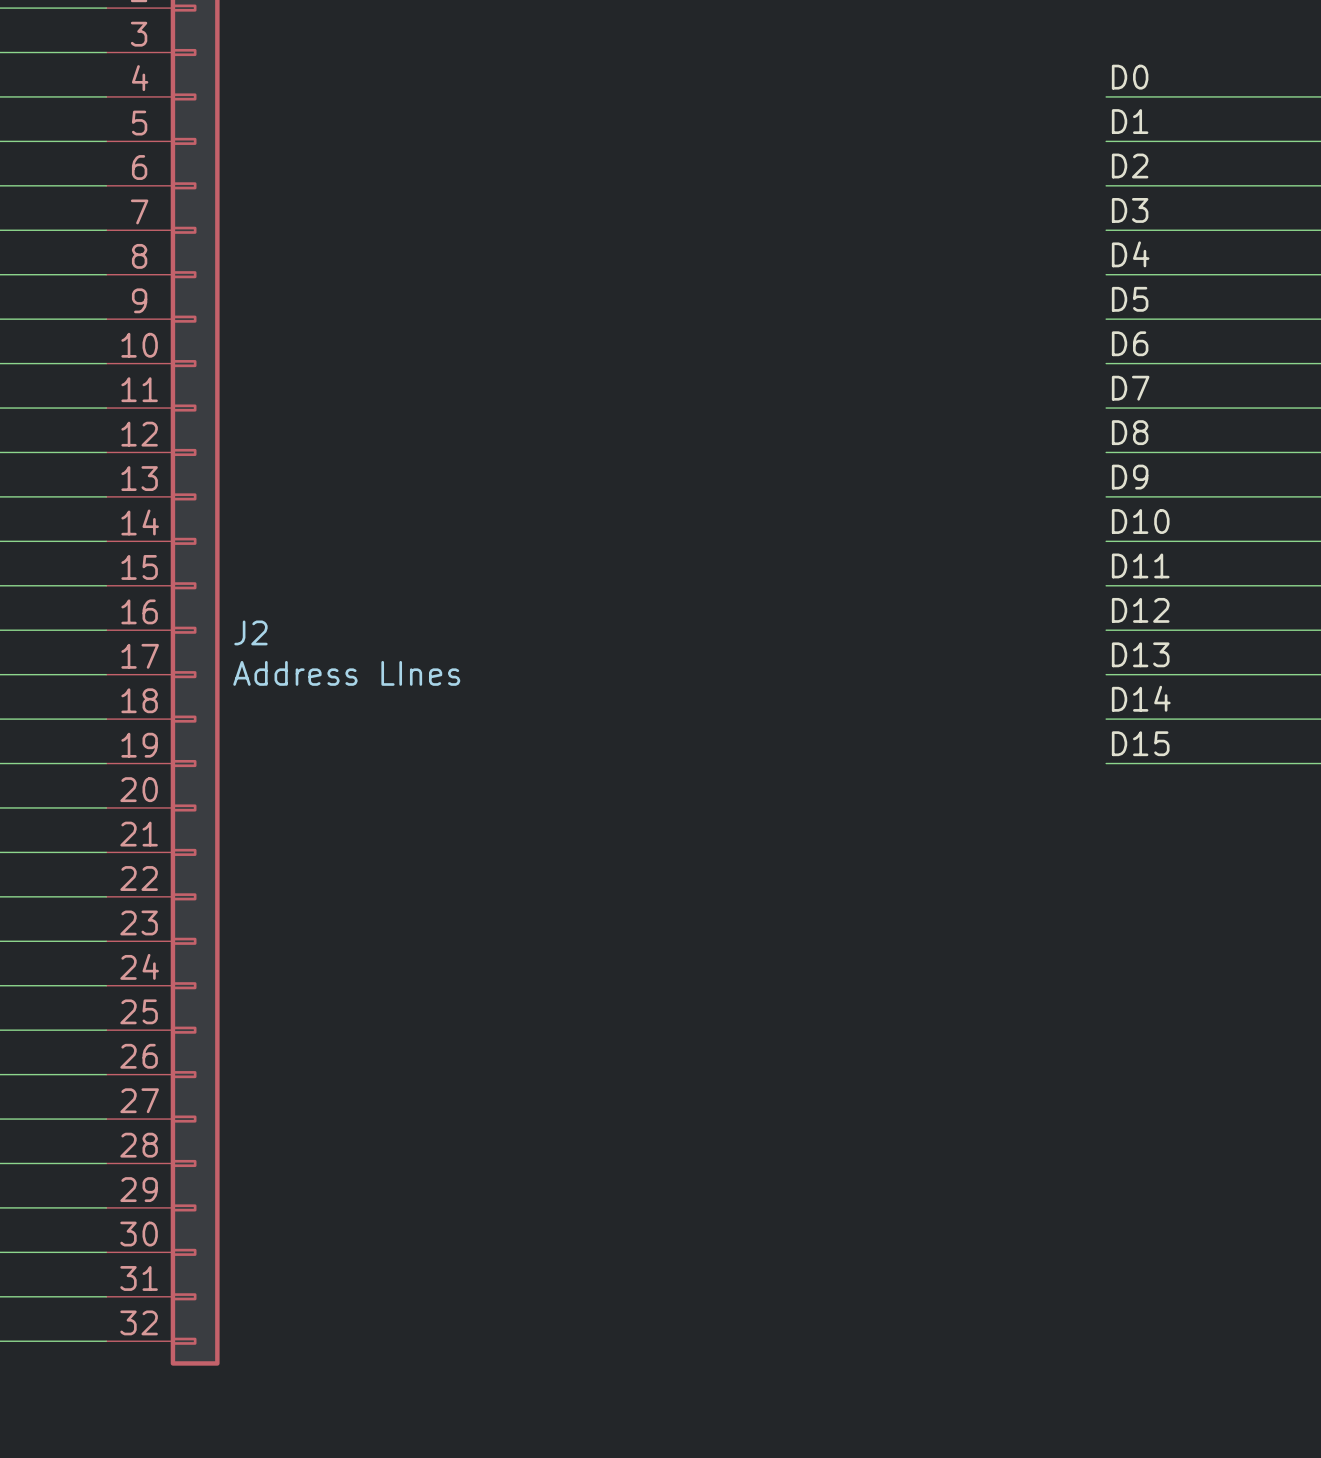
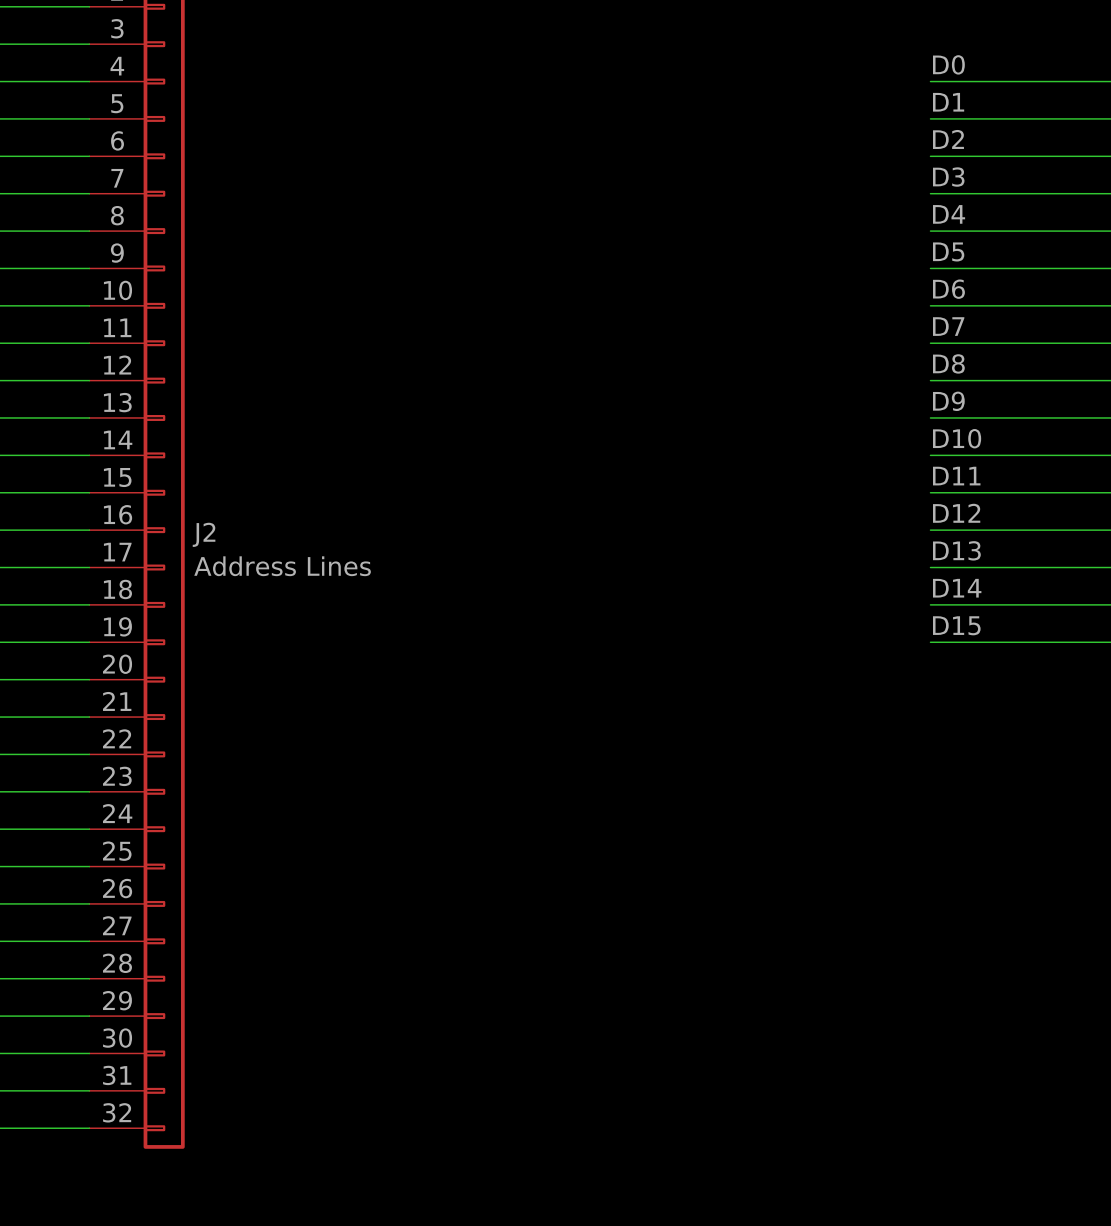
J2 value: Address LInes (346, 673) -> Address Lines (282, 566)

